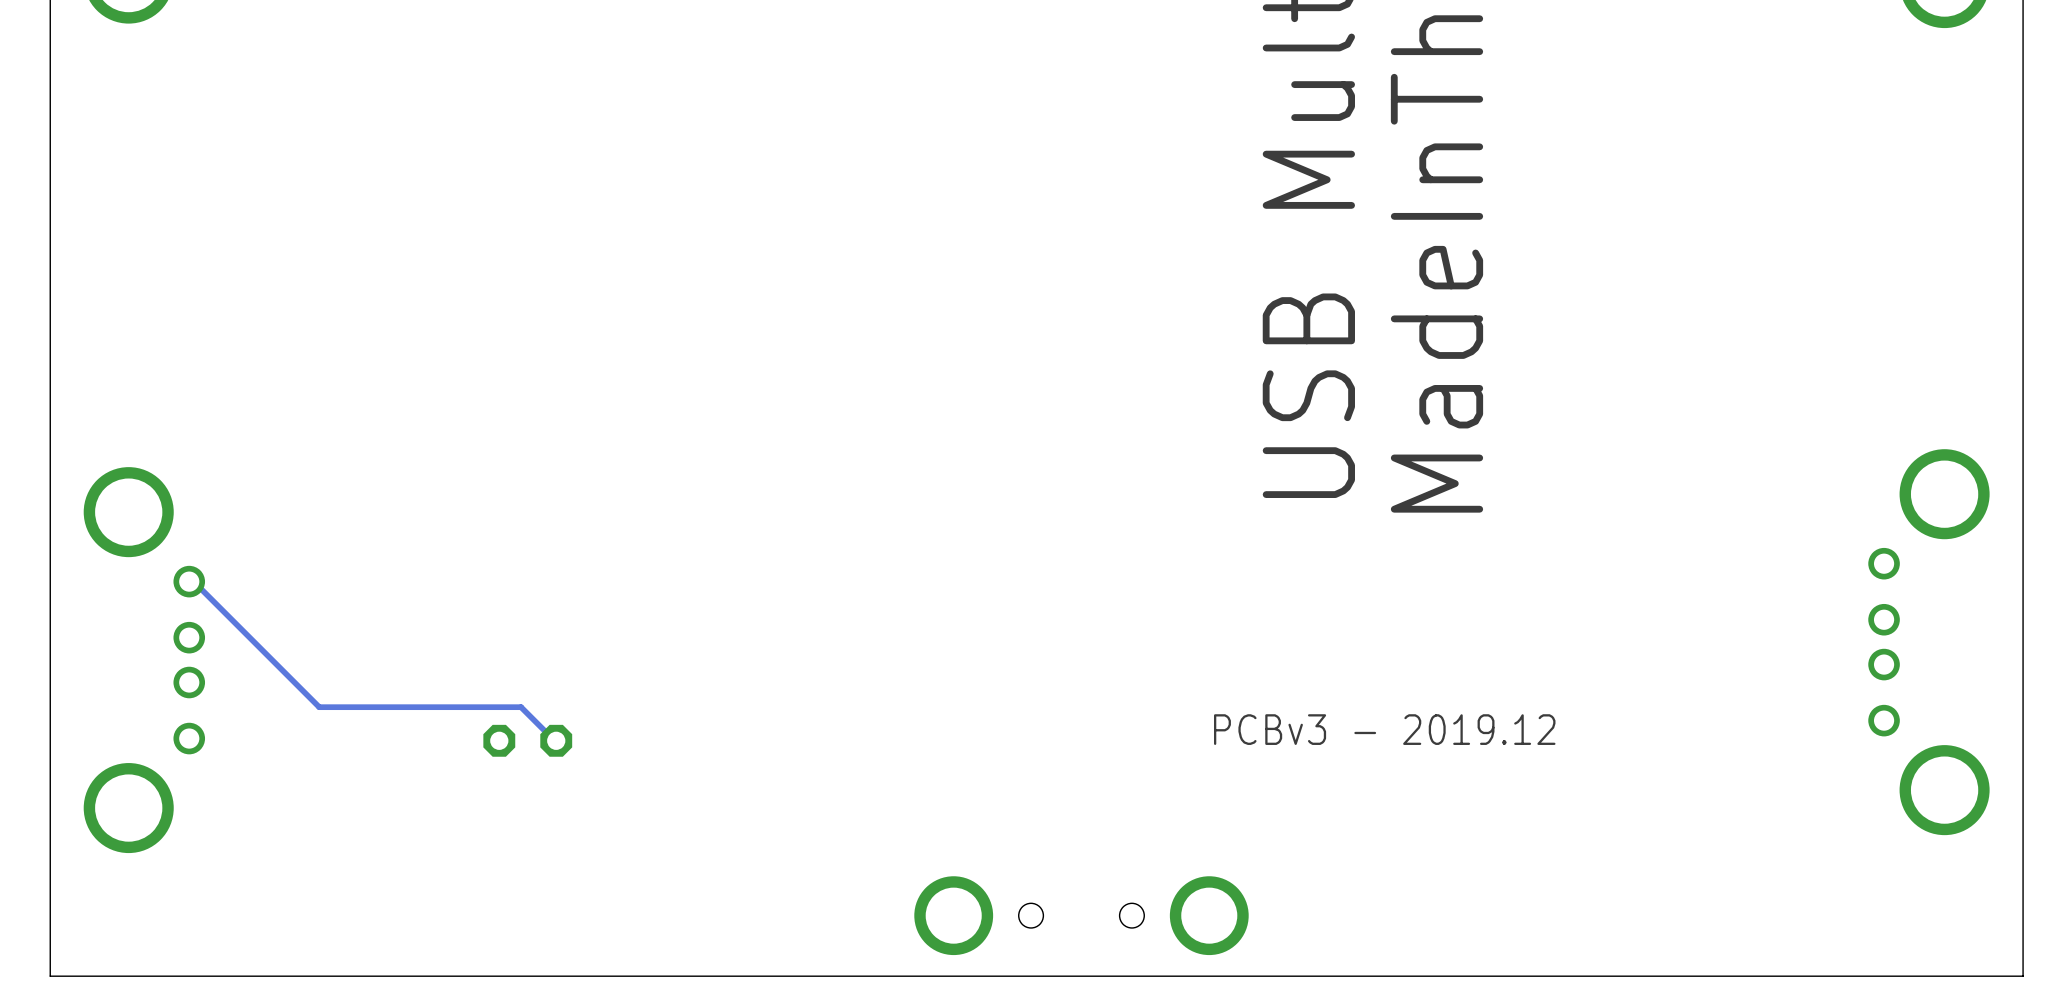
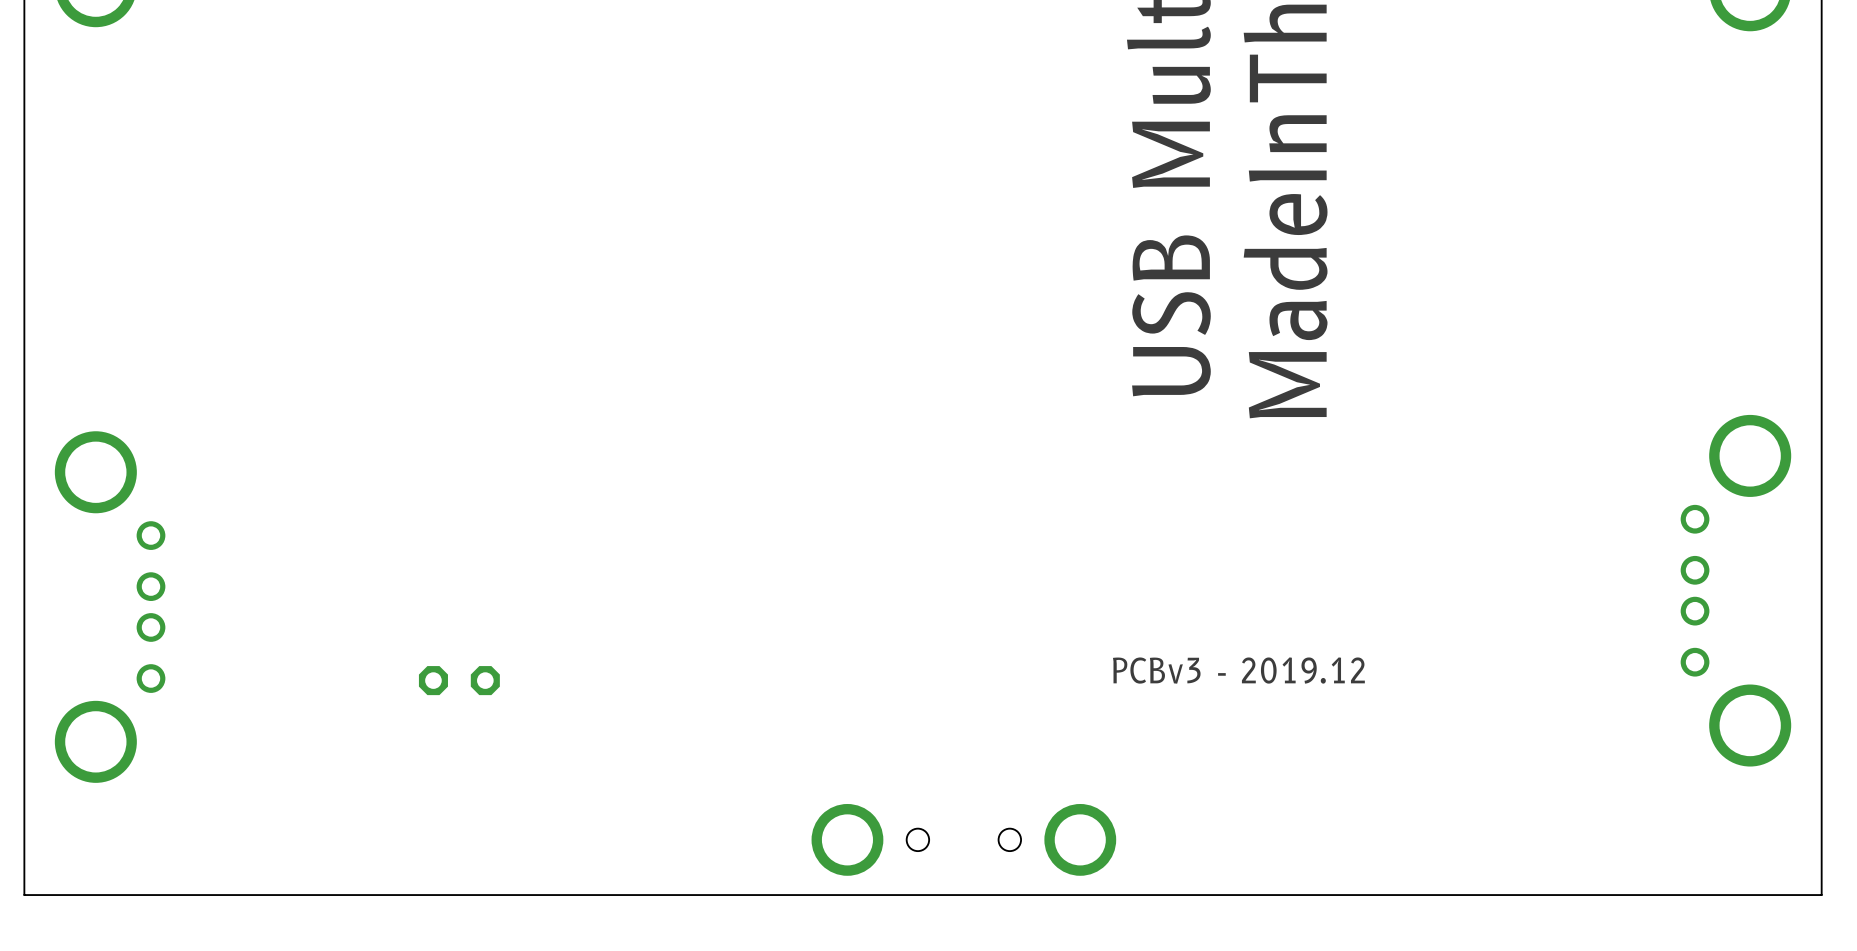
track: (189, 581) (195, 583) (319, 707) (521, 707) (556, 740) -> none

